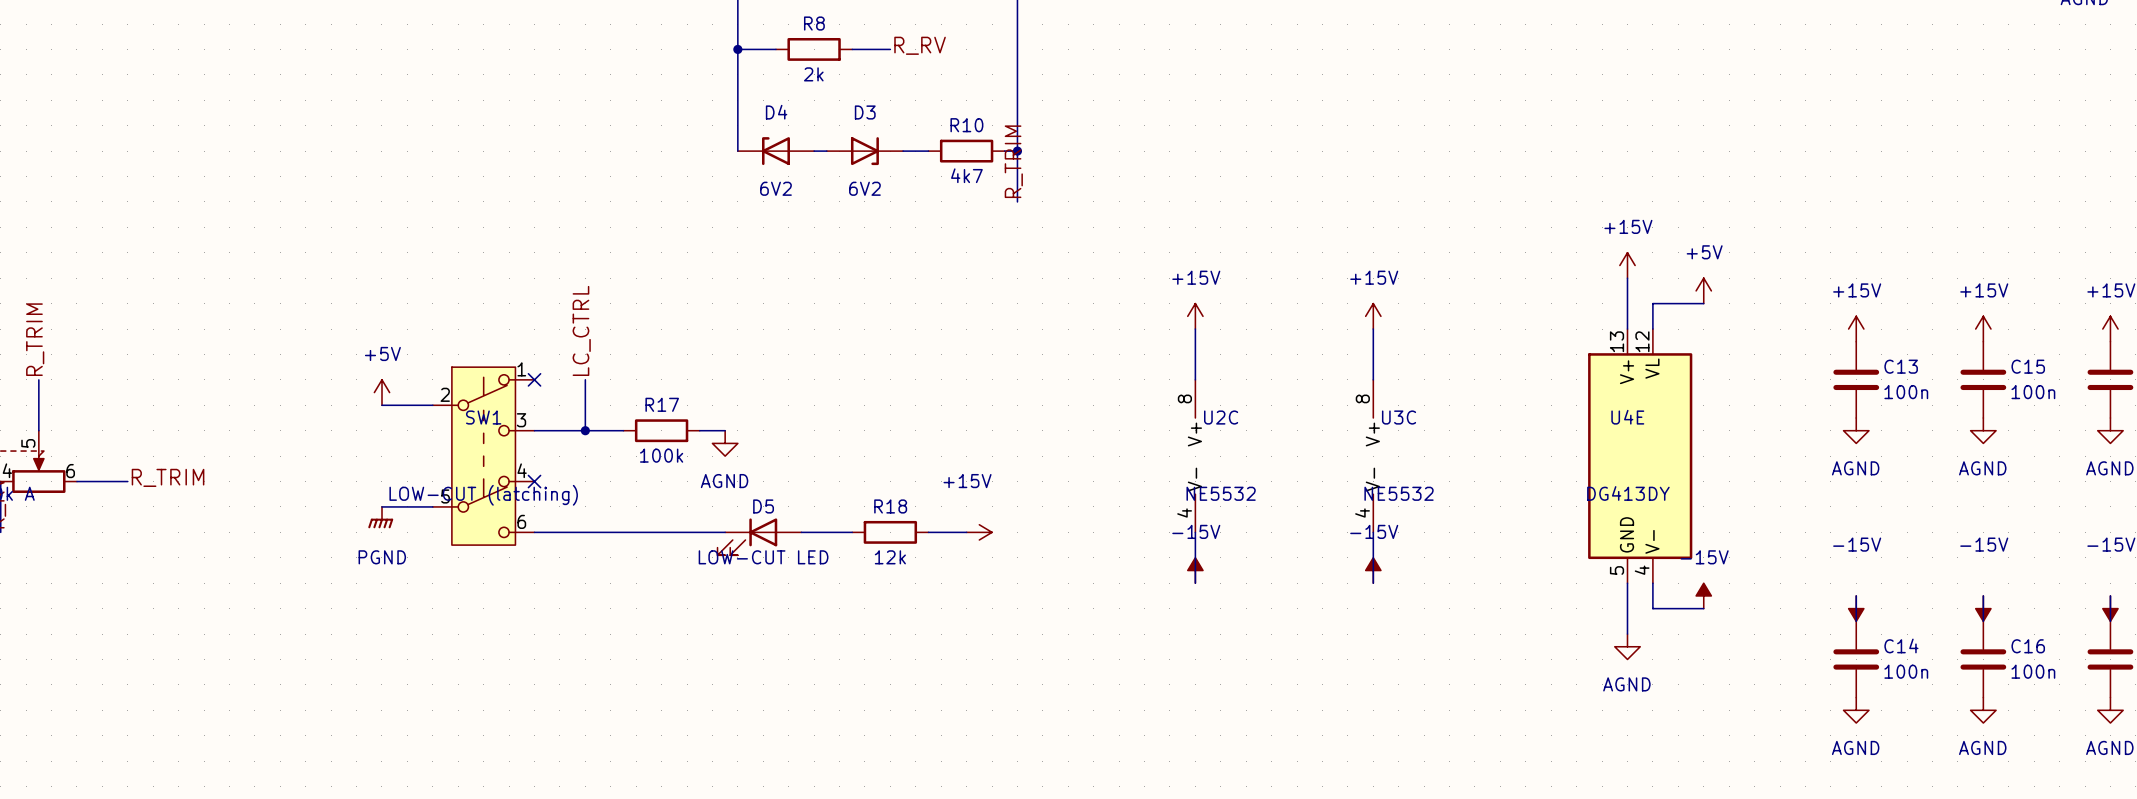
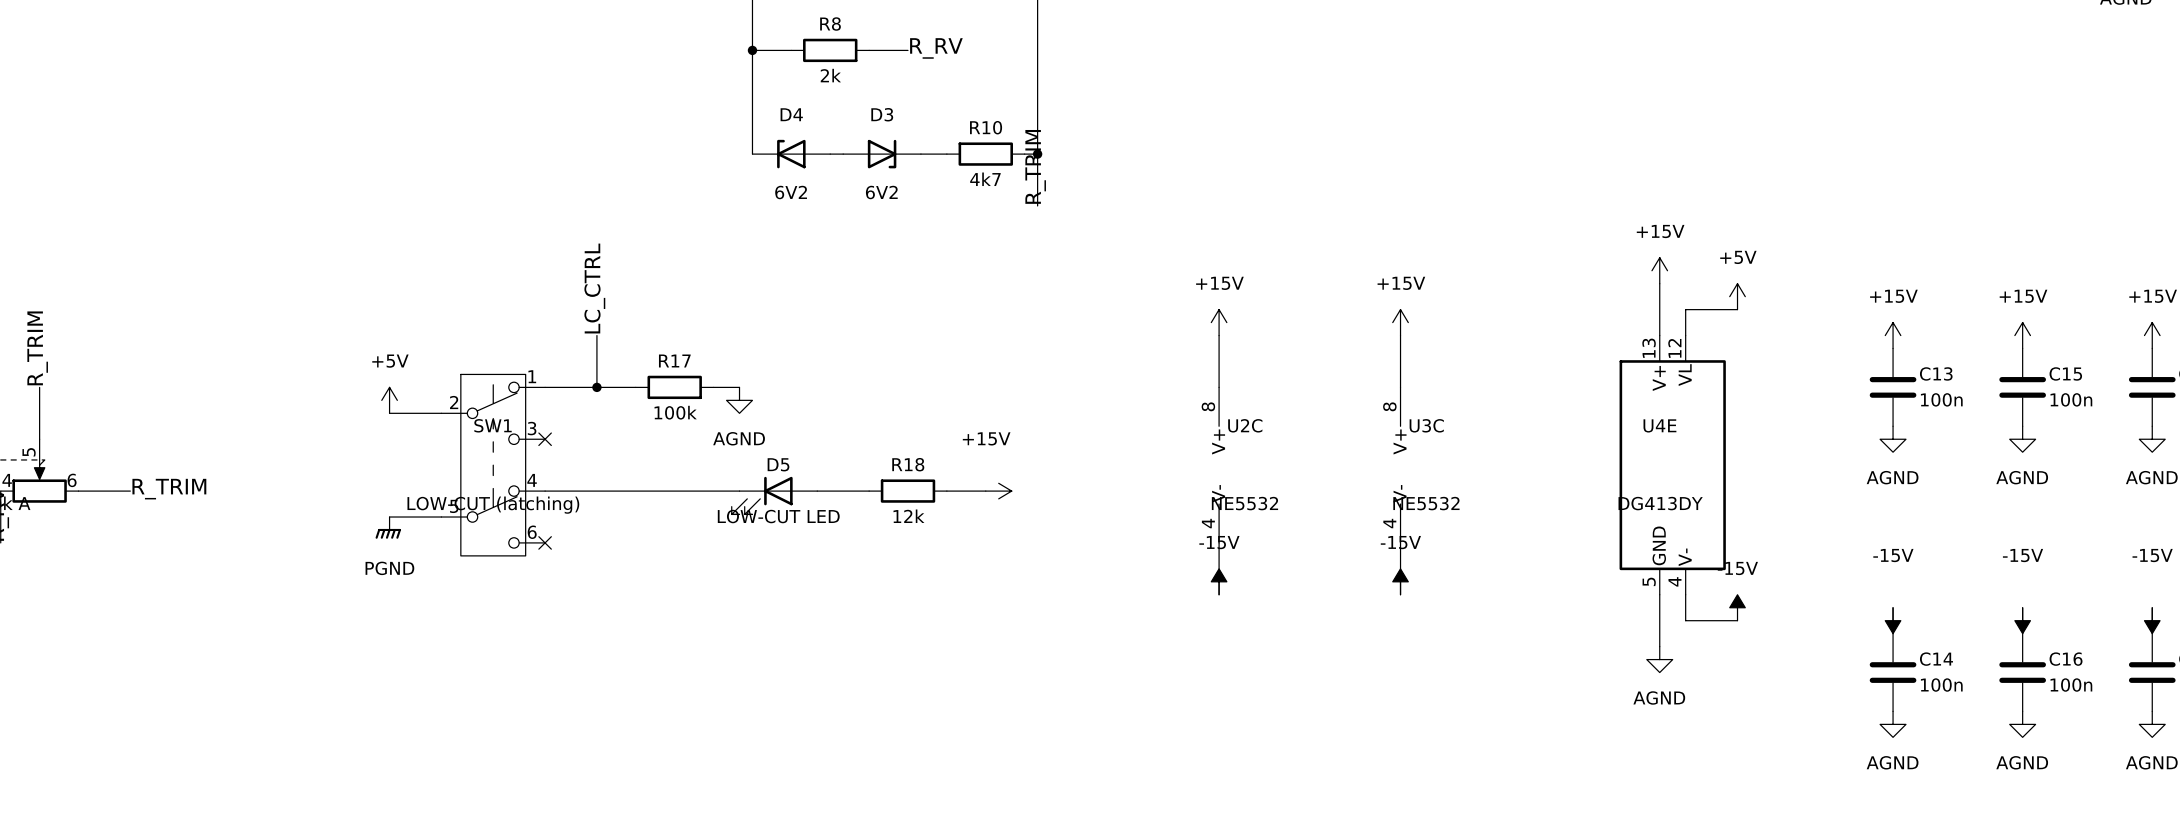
label position: LC_CTRL (581, 330) -> LC_CTRL (594, 288)
no-connect mark: (534, 379) -> none
wire: (585, 379) (585, 430) -> (596, 387) (596, 335)
wire: (534, 430) (623, 430) -> (545, 387) (635, 387)
no-connect mark: none -> (545, 439)
junction position: (585, 430) -> (596, 387)
R17 position: (661, 430) -> (674, 387)
wire: (699, 430) (725, 430) -> (713, 387) (739, 387)
power symbol position: AGND (725, 443) -> AGND (739, 400)
no-connect mark: (534, 481) -> none
wire: (534, 532) (725, 532) -> (545, 491) (739, 491)
no-connect mark: none -> (545, 542)
wire: (801, 532) (852, 532) -> (817, 491) (869, 491)
R18 position: (890, 532) -> (908, 491)
wire: (928, 532) (966, 532) -> (946, 491) (985, 491)
power symbol position: +15V (979, 532) -> +15V (998, 491)
D5 position: (759, 536) -> (774, 495)

